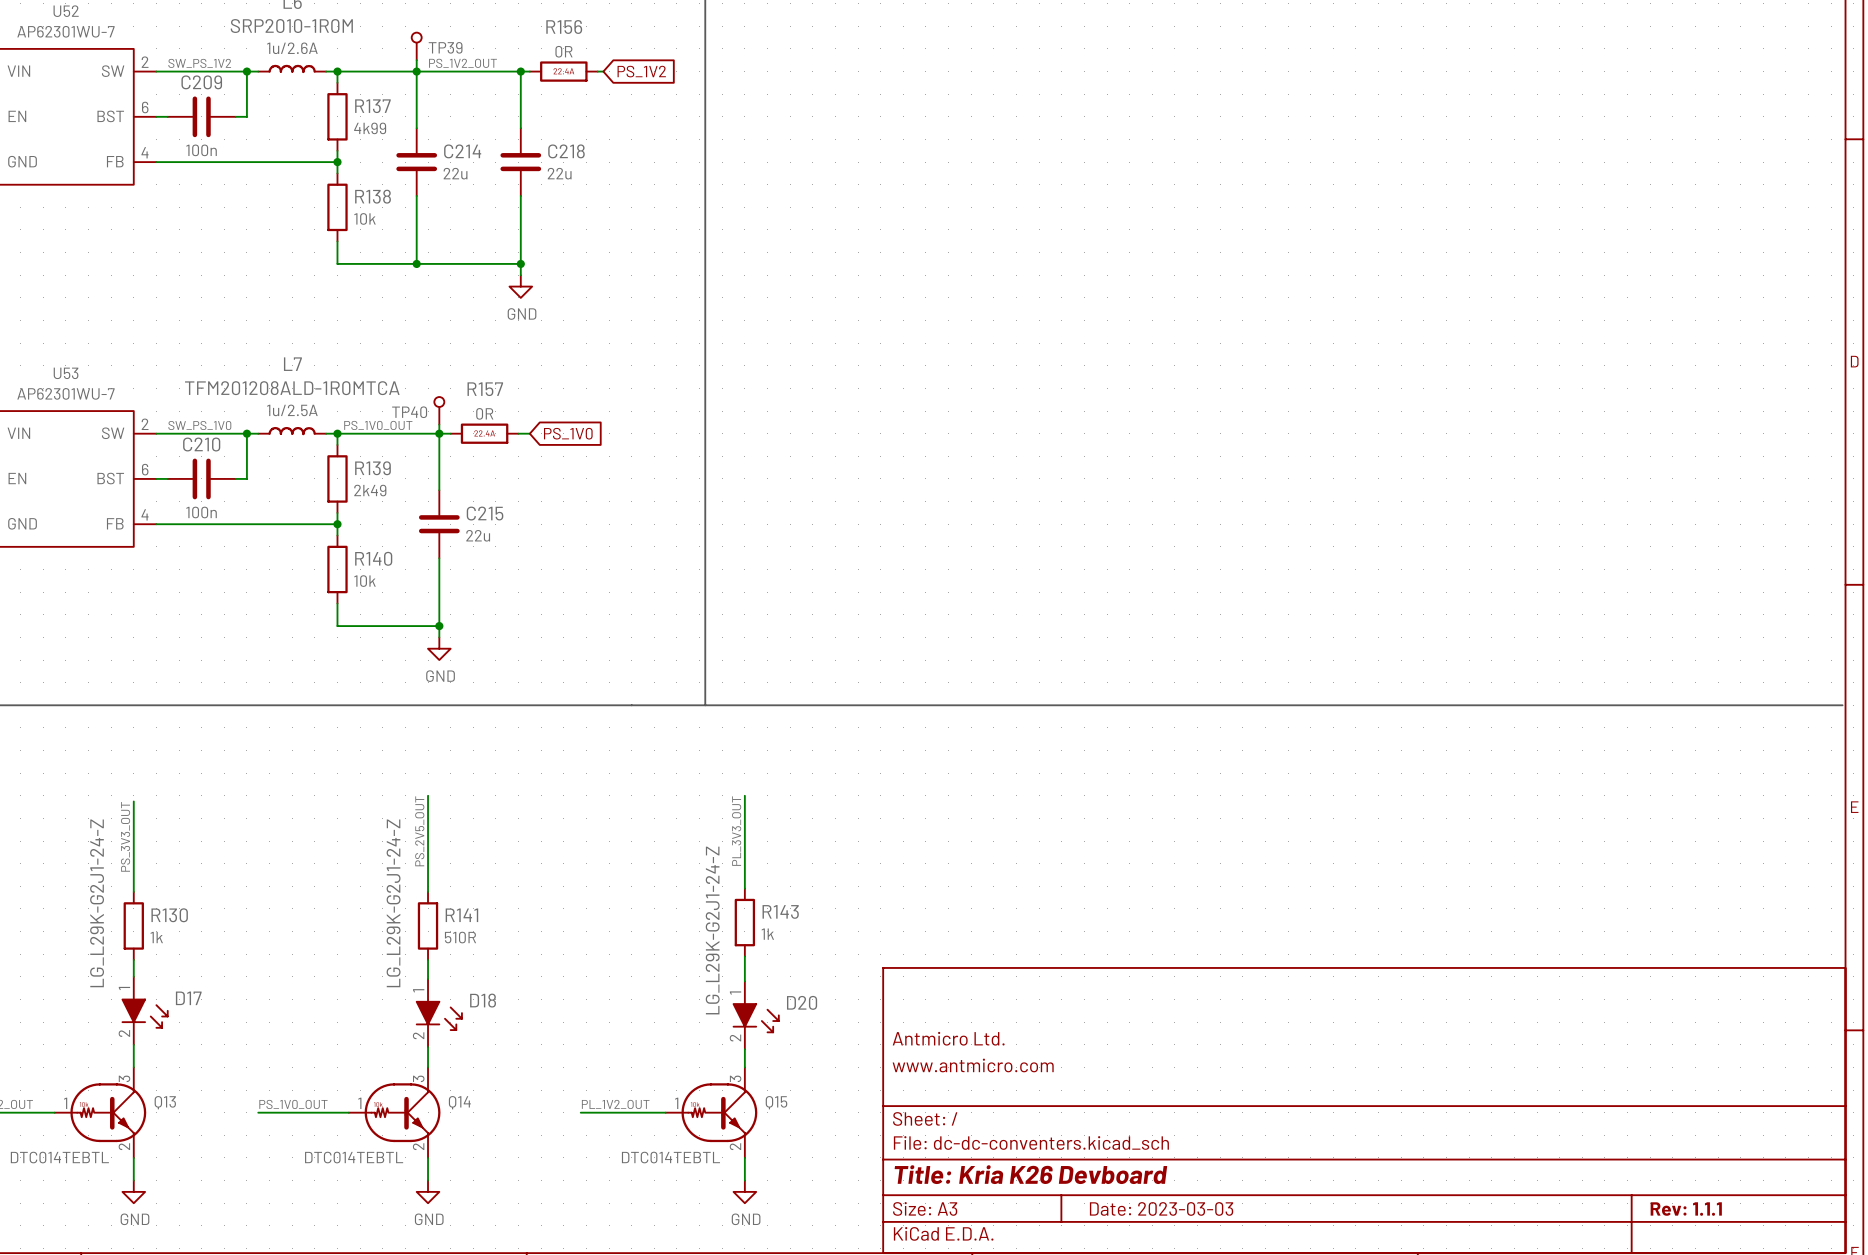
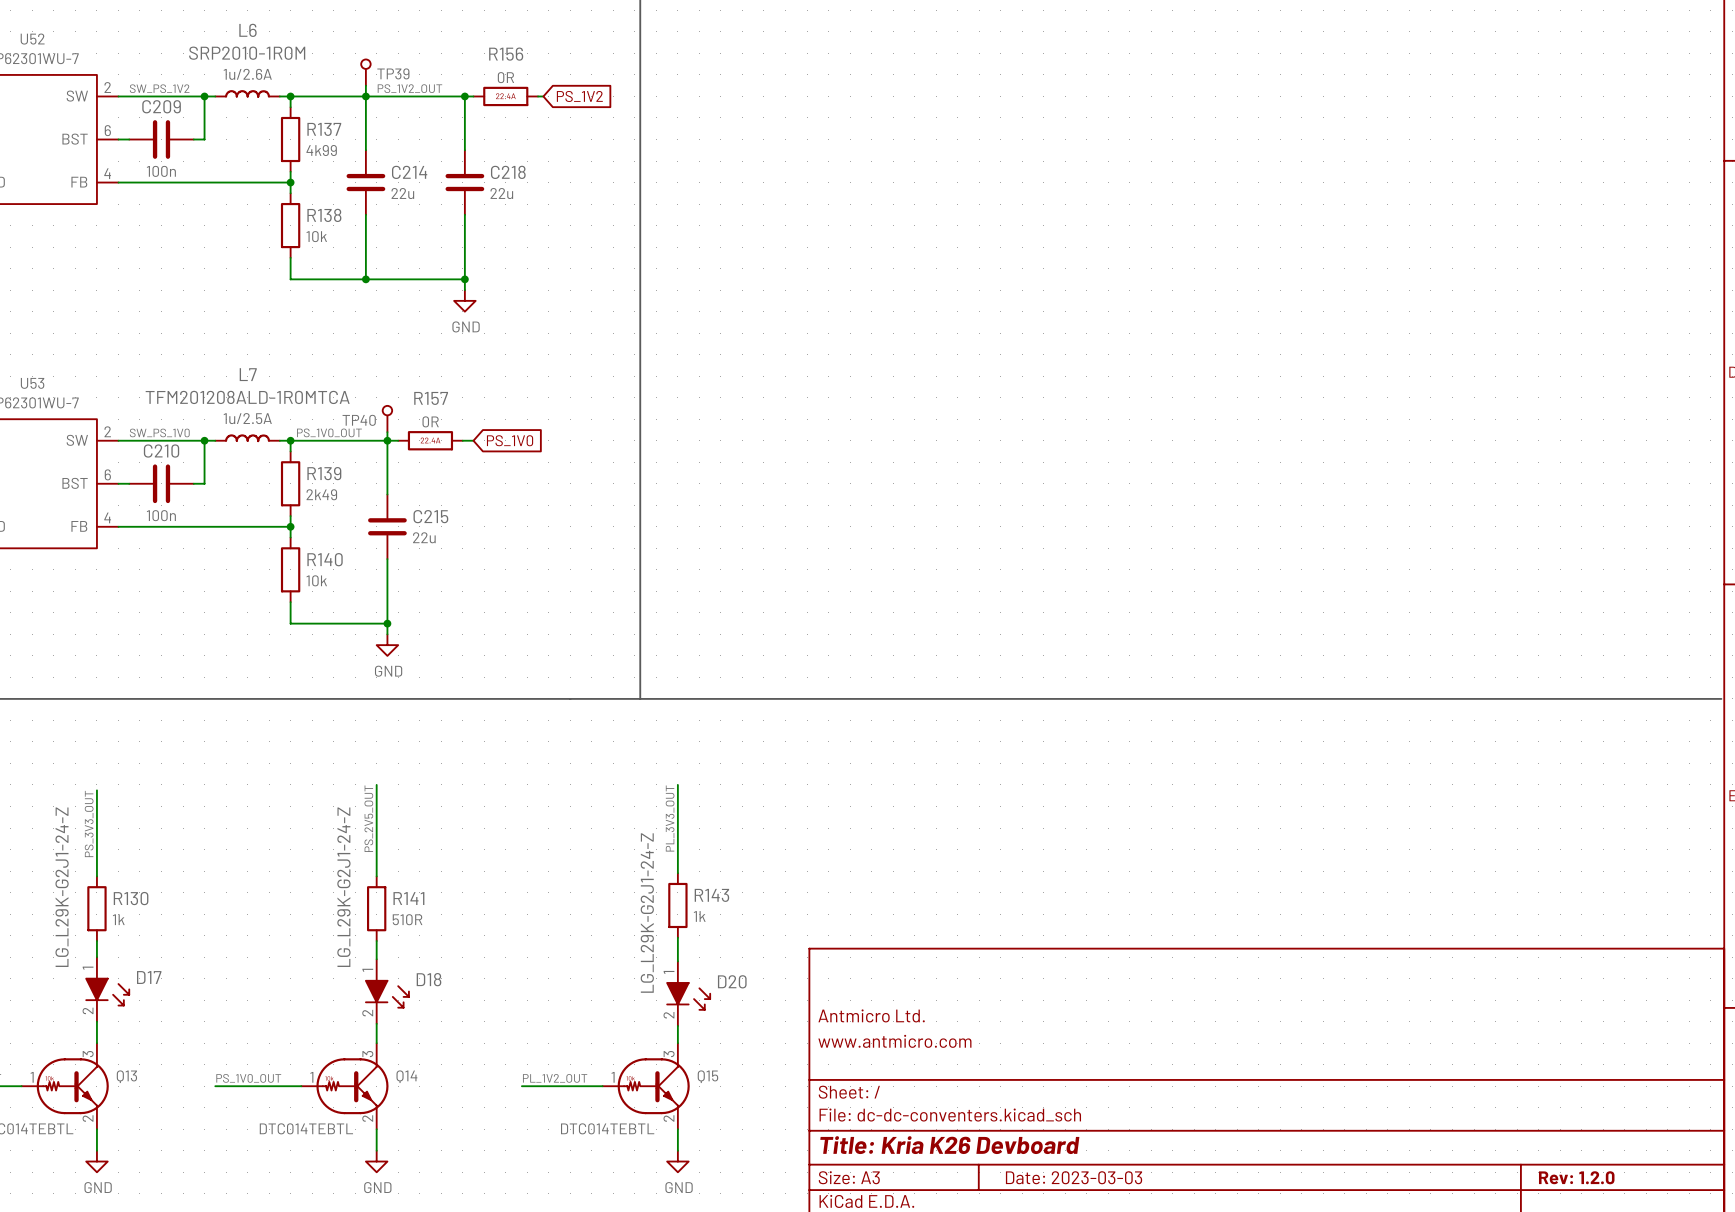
title block: Rev: 1.1.1 (1686, 1209) -> Rev: 1.2.0 (1576, 1177)

